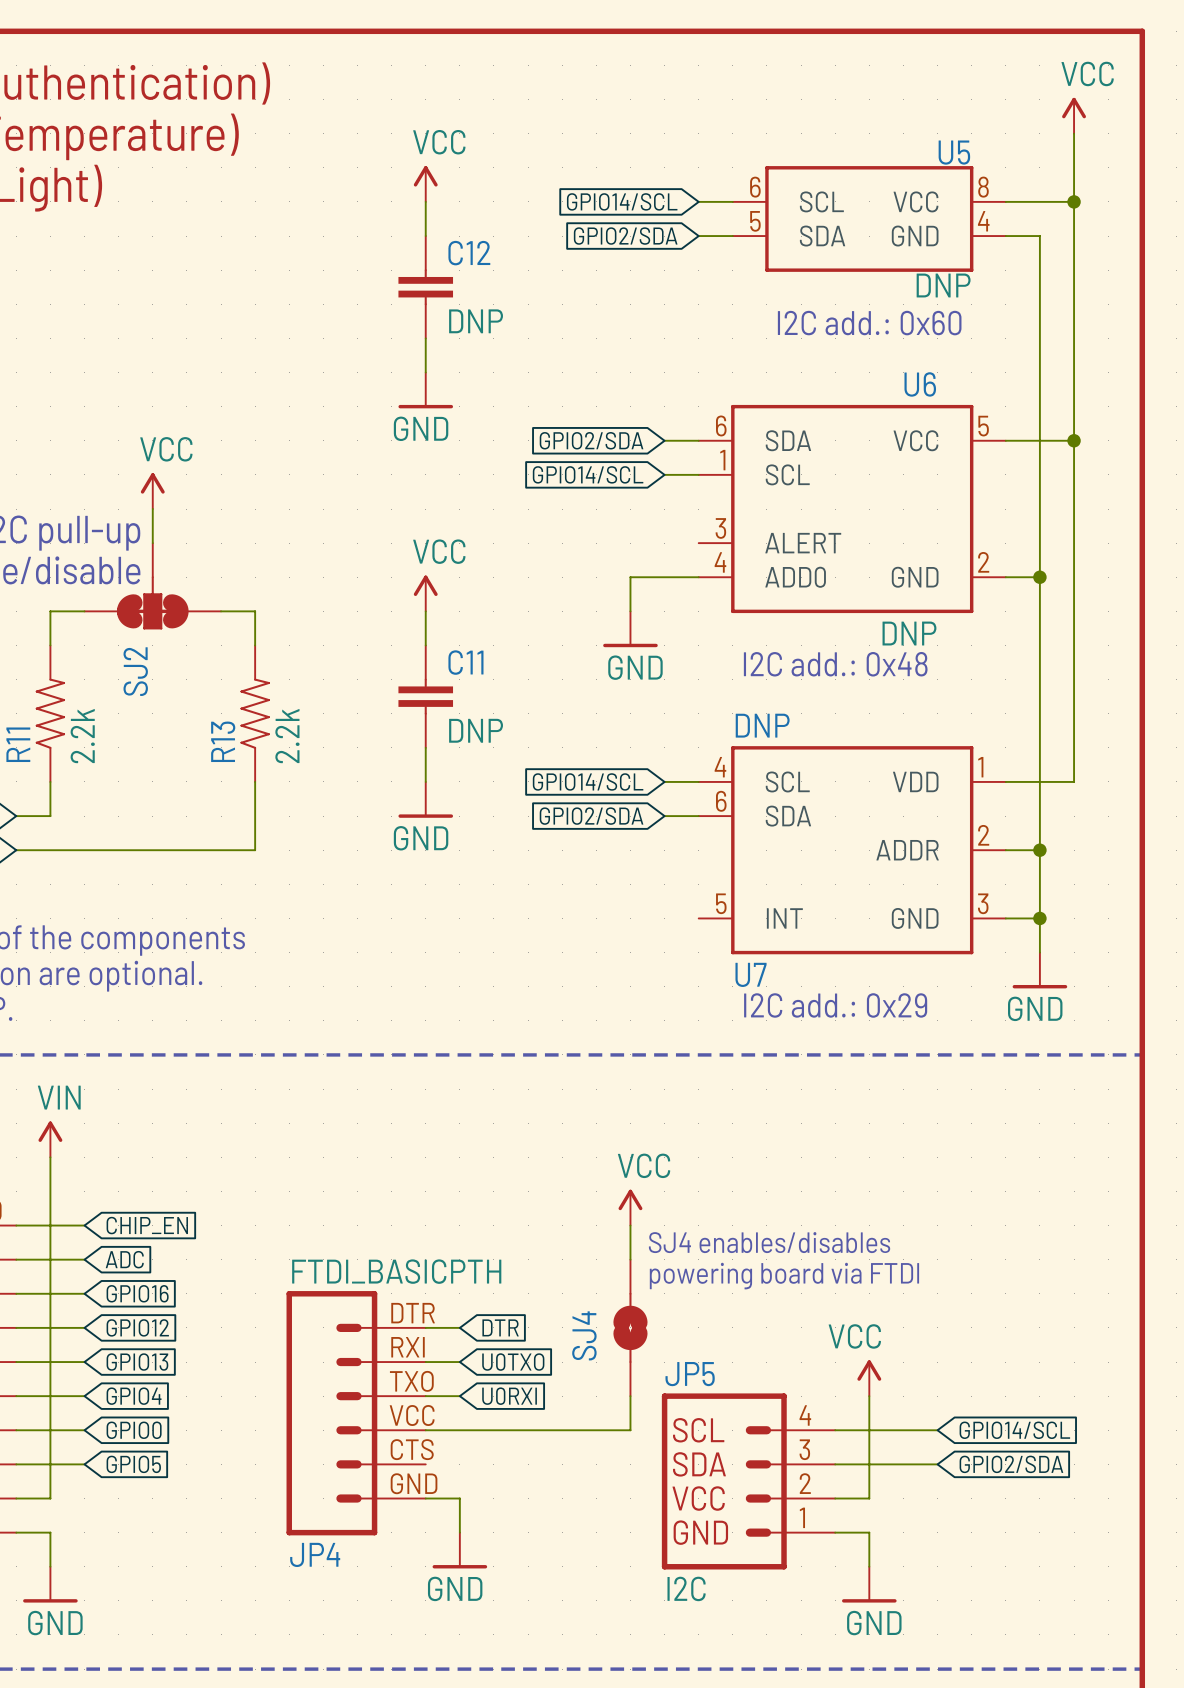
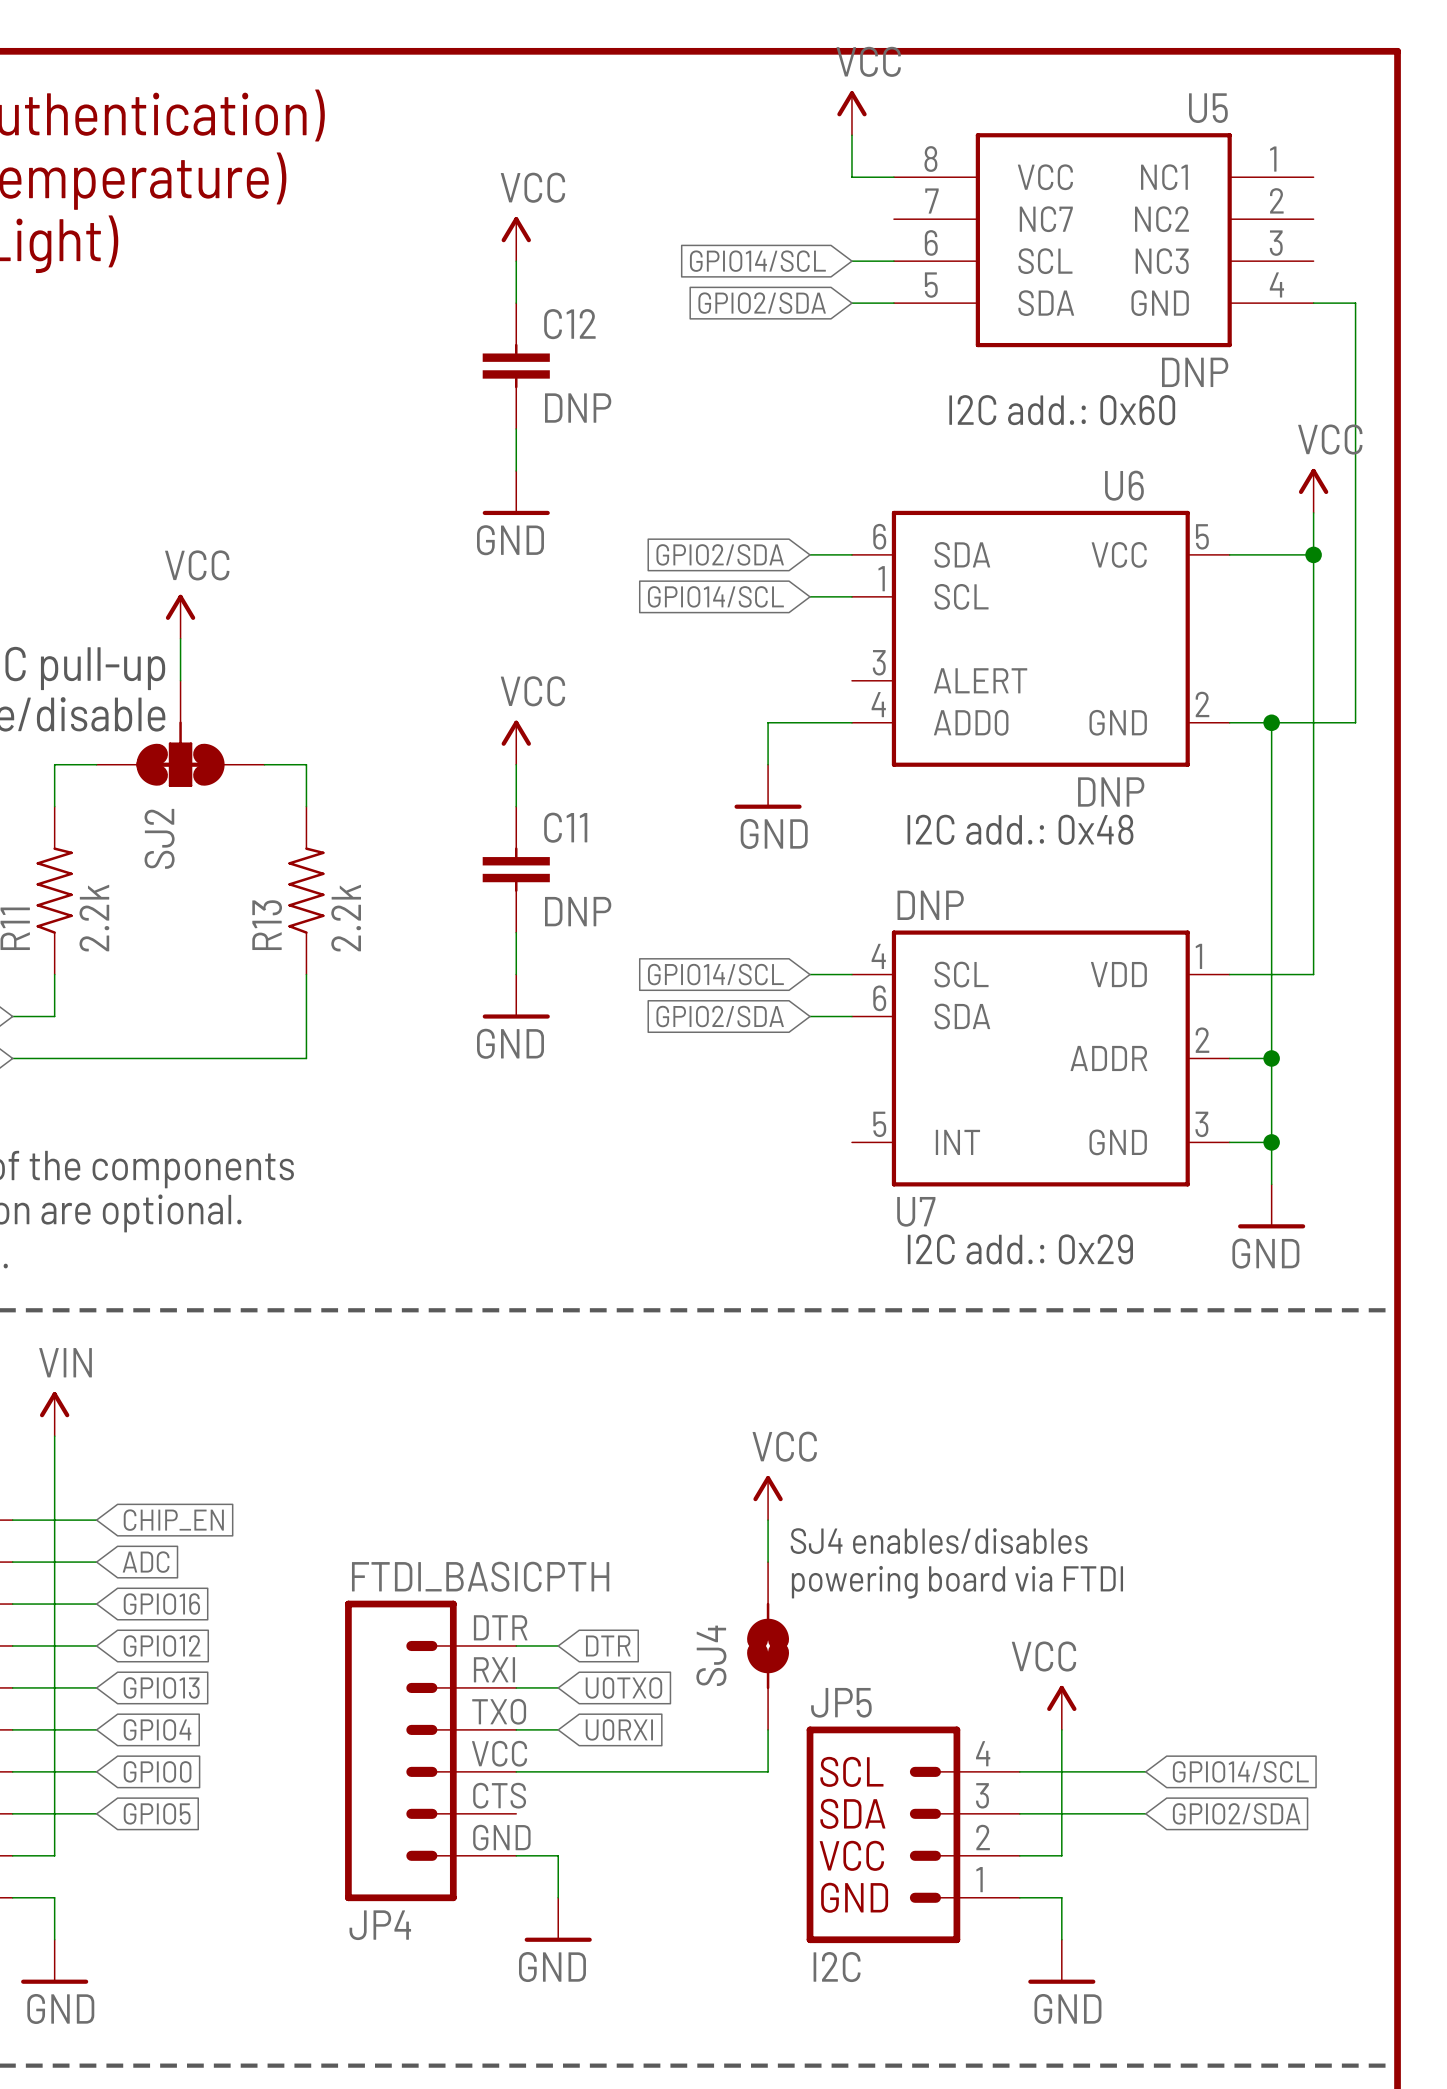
power symbol: none -> VCC (851, 113)
wire: none -> (851, 135) (851, 177) (893, 177)
power symbol: VCC (1074, 115) -> none
wire: (1074, 133) (1074, 406) -> none
U5 name position: U5 (954, 152) -> U5 (1208, 108)
U5 symbol: [732, 166, 1006, 272] -> [893, 133, 1314, 348]
junction: (1074, 201) -> none
wire: (1005, 236) (1039, 236) (1039, 577) -> (1313, 303) (1355, 303) (1355, 722) (1271, 722)
U5 value position: DNP (943, 285) -> DNP (1195, 372)
power symbol: none -> VCC (1313, 490)

